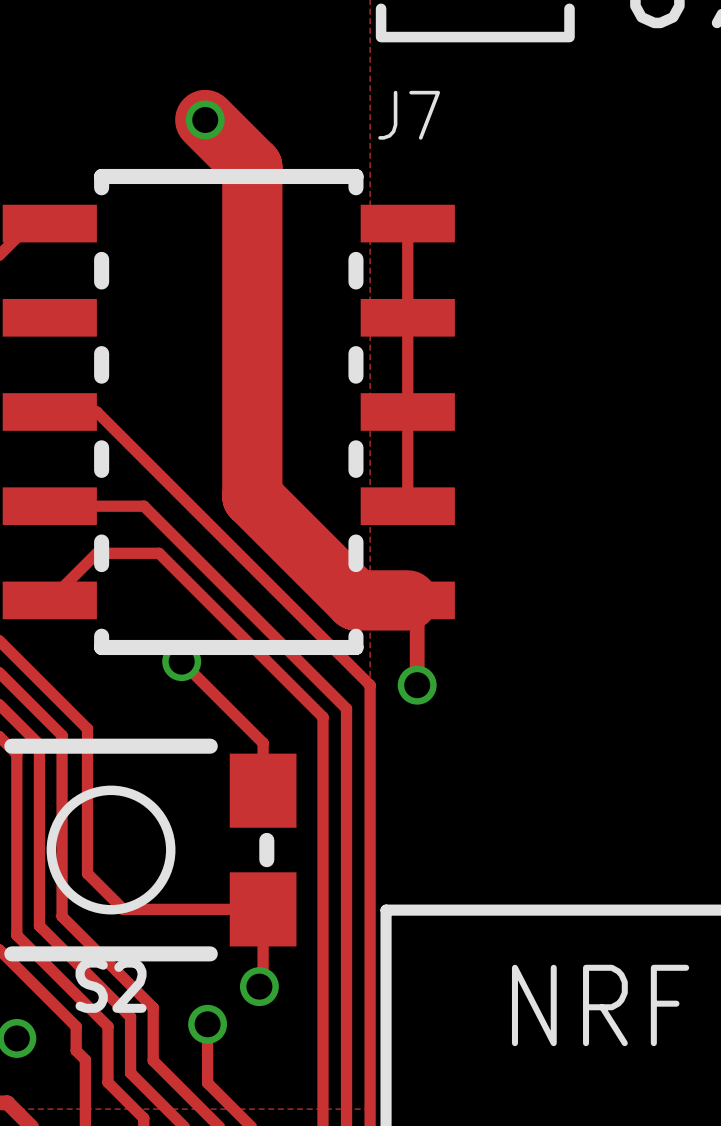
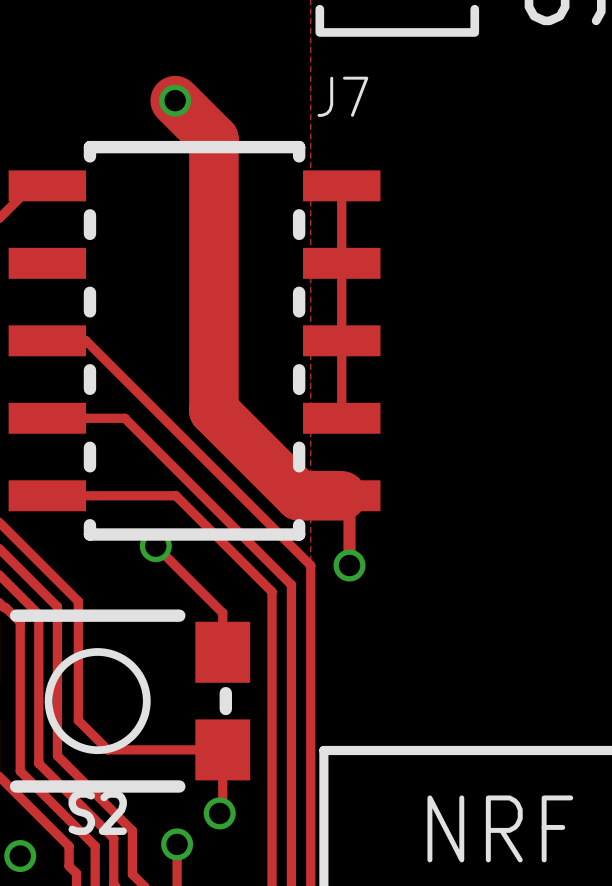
track: (49, 600) (96, 553) (159, 553) (206, 600) -> (47, 495) (176, 495)

